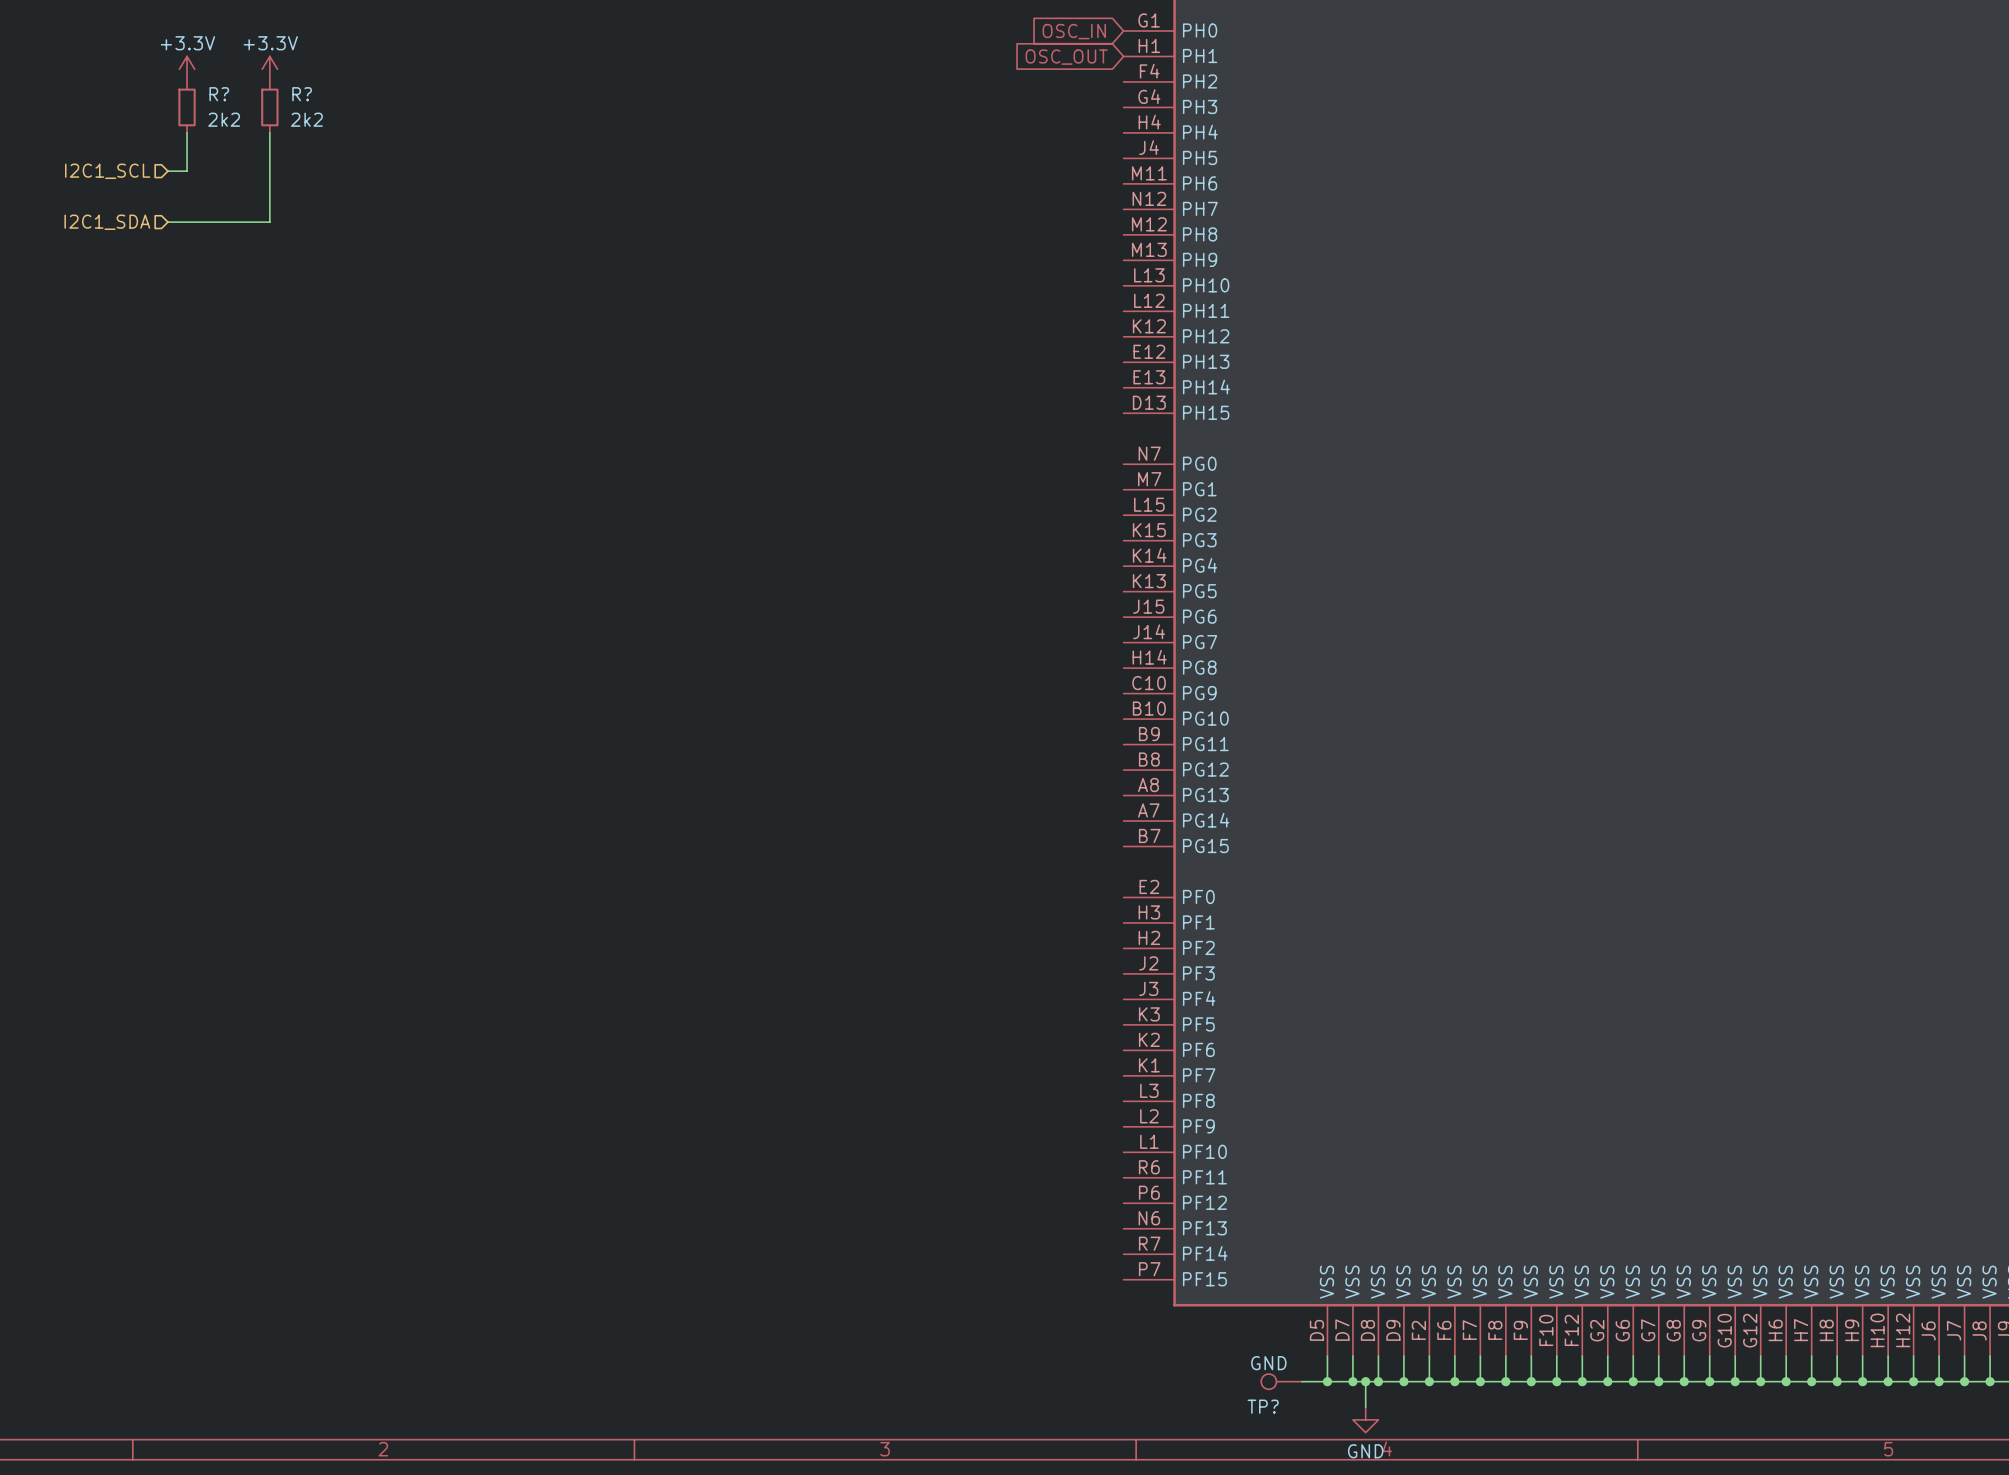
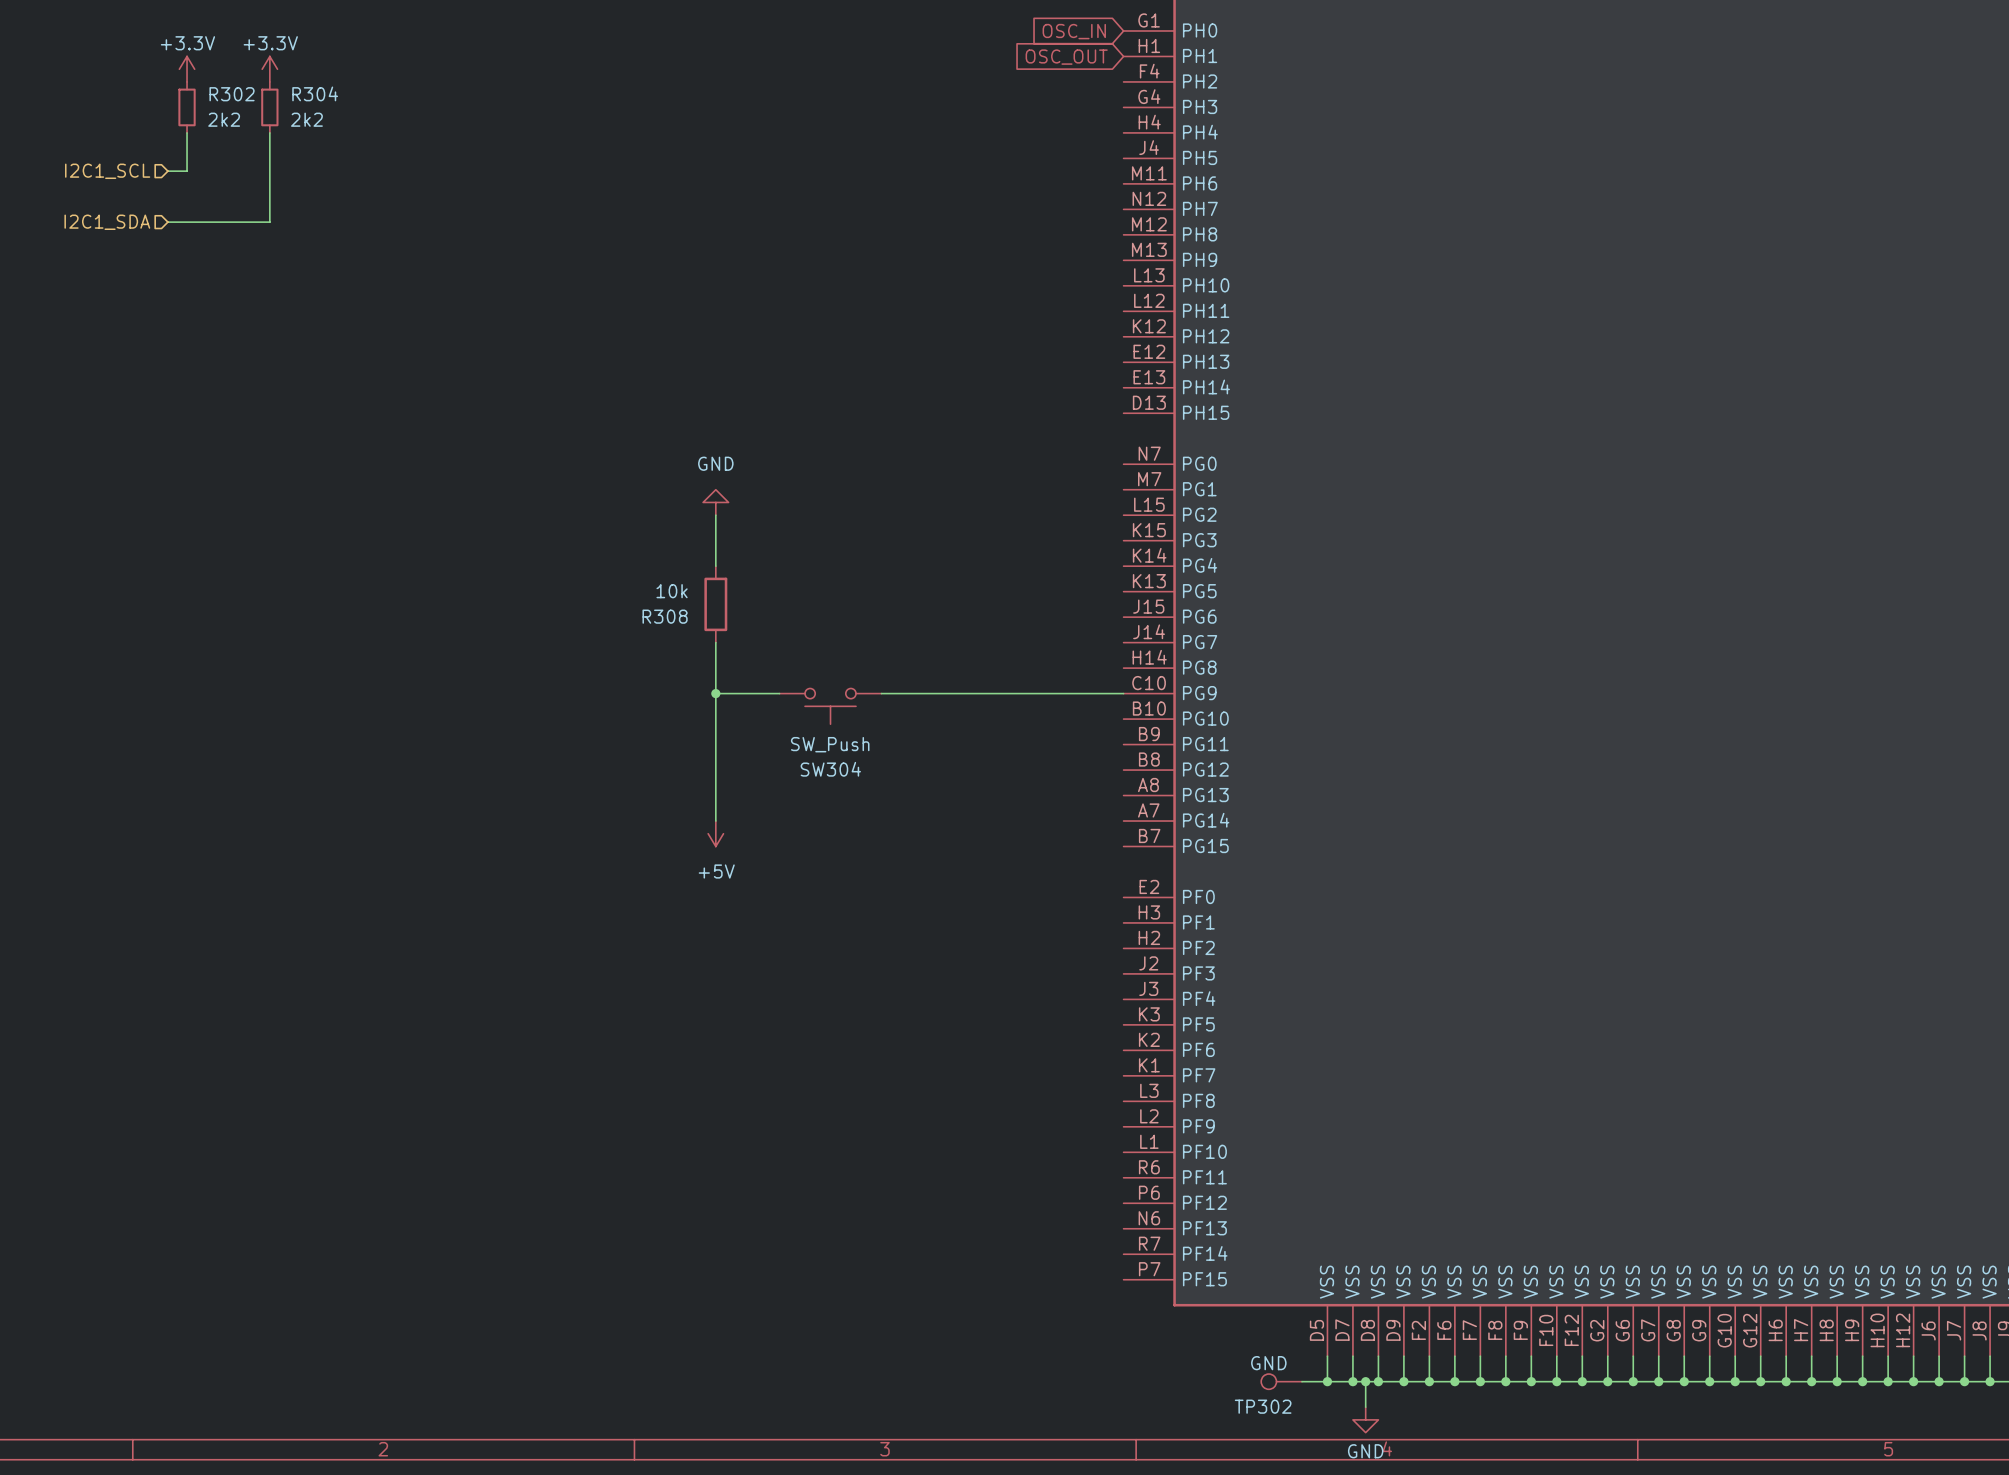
R? name: R? (219, 94) -> R302 (232, 94)
R? name: R? (302, 94) -> R304 (315, 93)
power symbol: none -> GND (715, 502)
wire: none -> (715, 515) (715, 566)
R308: none -> 10k (715, 604)
wire: none -> (715, 642) (715, 821)
wire: none -> (715, 693) (779, 693)
junction: none -> (715, 693)
wire: none -> (881, 693) (1123, 693)
SW304: none -> SW_Push (830, 706)
power symbol: none -> +5V (715, 833)
TP? name: TP? (1263, 1406) -> TP302 (1263, 1406)

